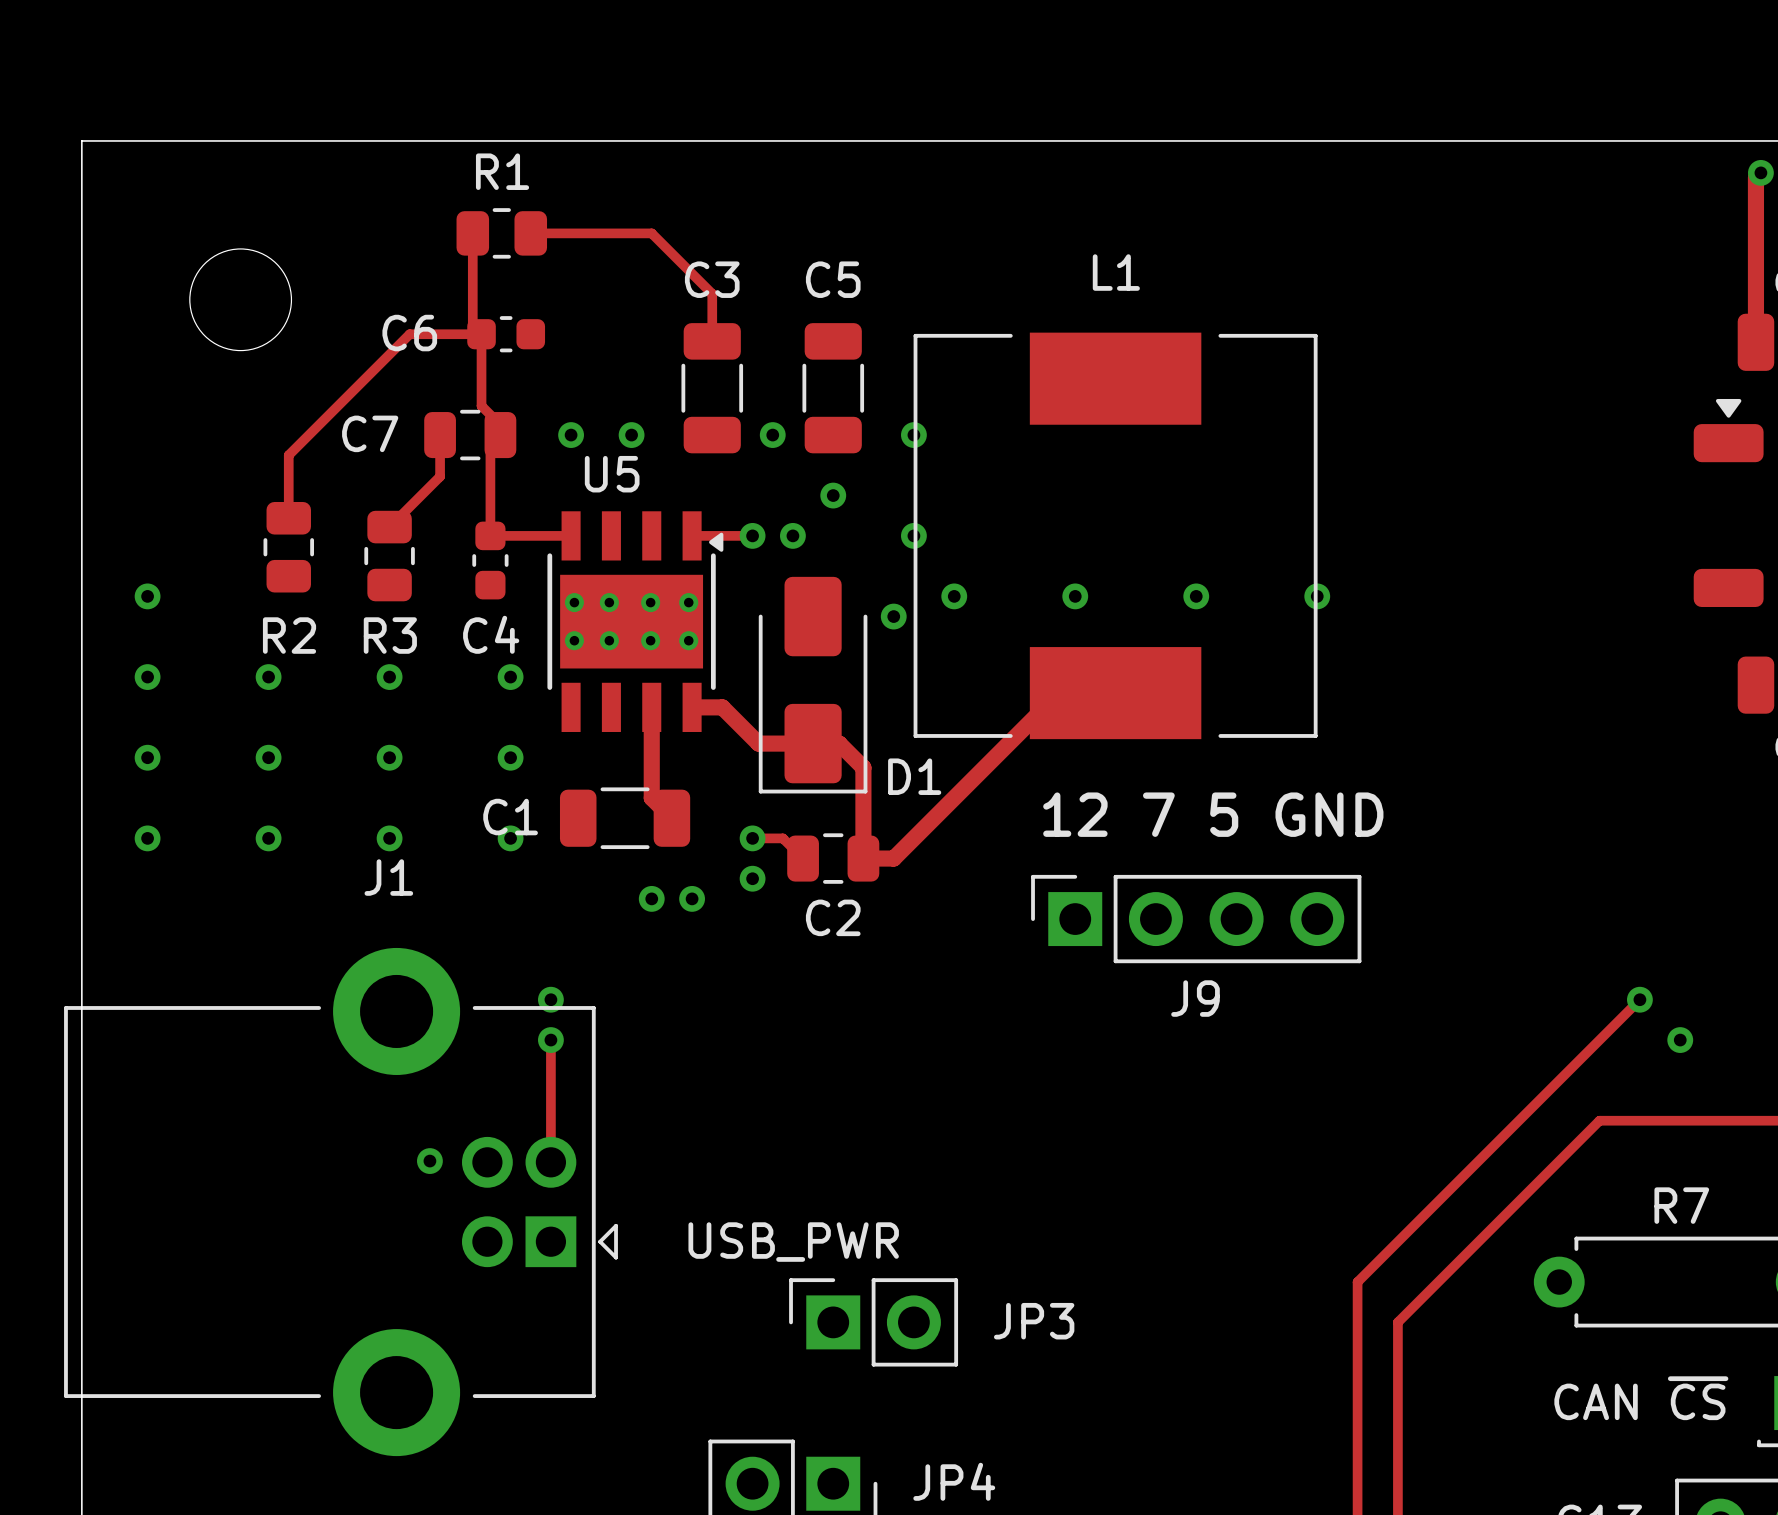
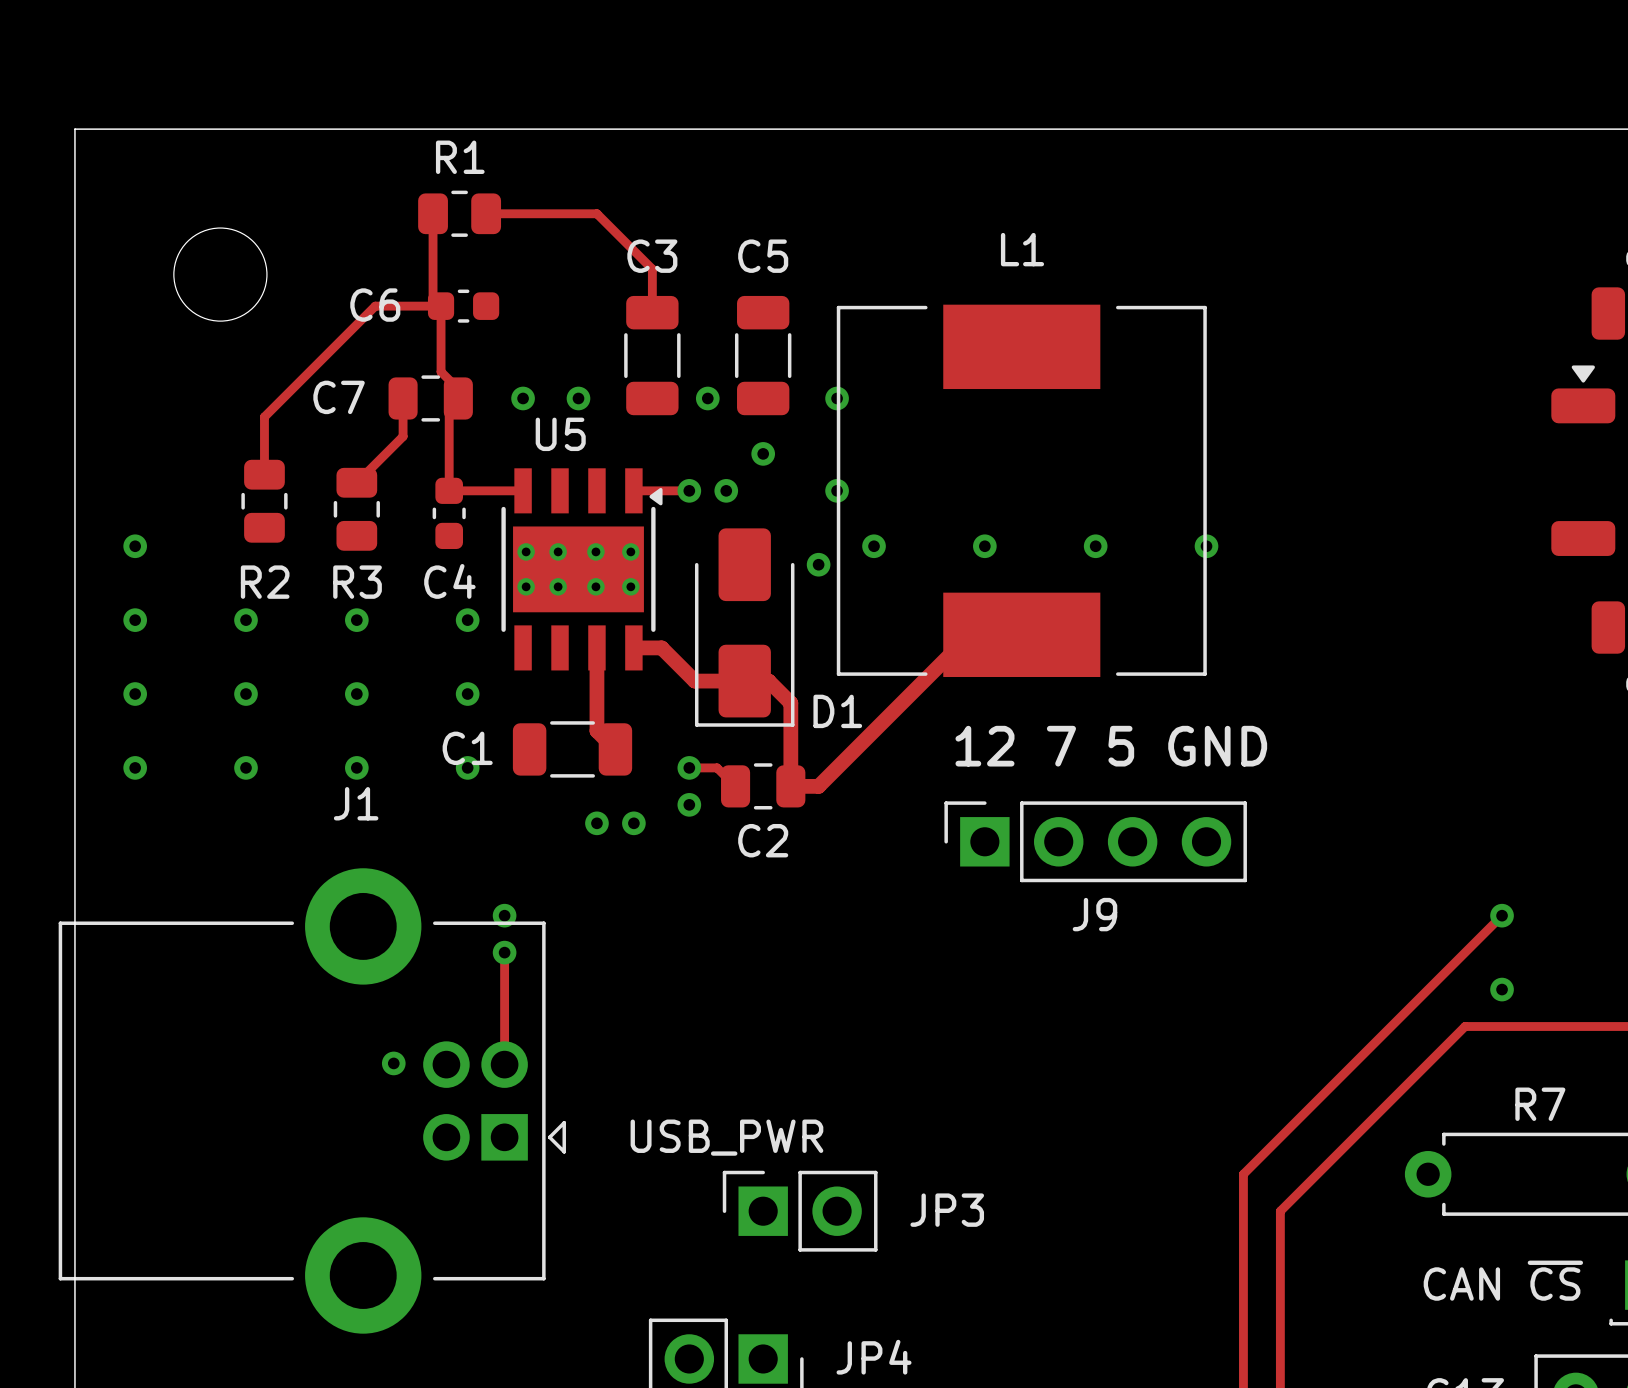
track: (1760, 172) (1755, 177) (1755, 342) -> none
via: (1760, 172) -> none
via position: (1680, 1040) -> (1502, 989)

